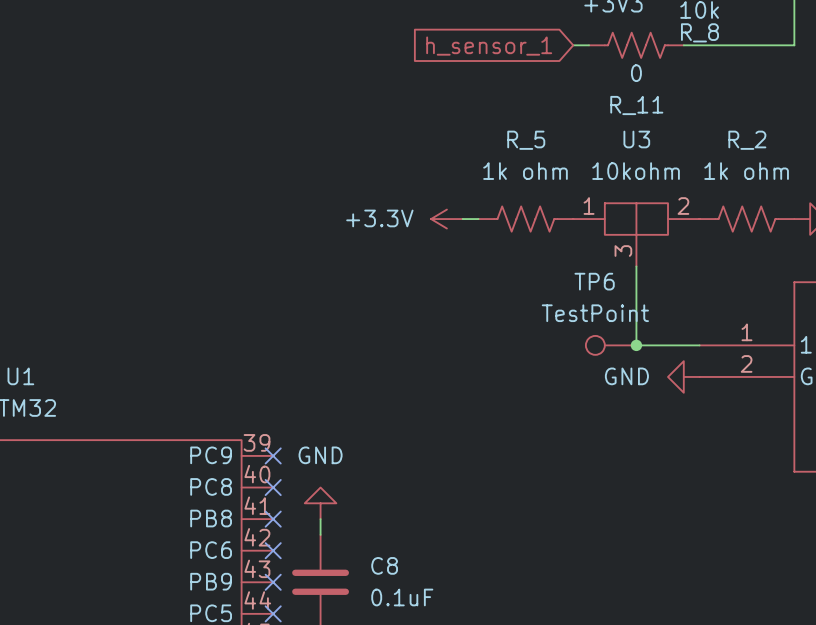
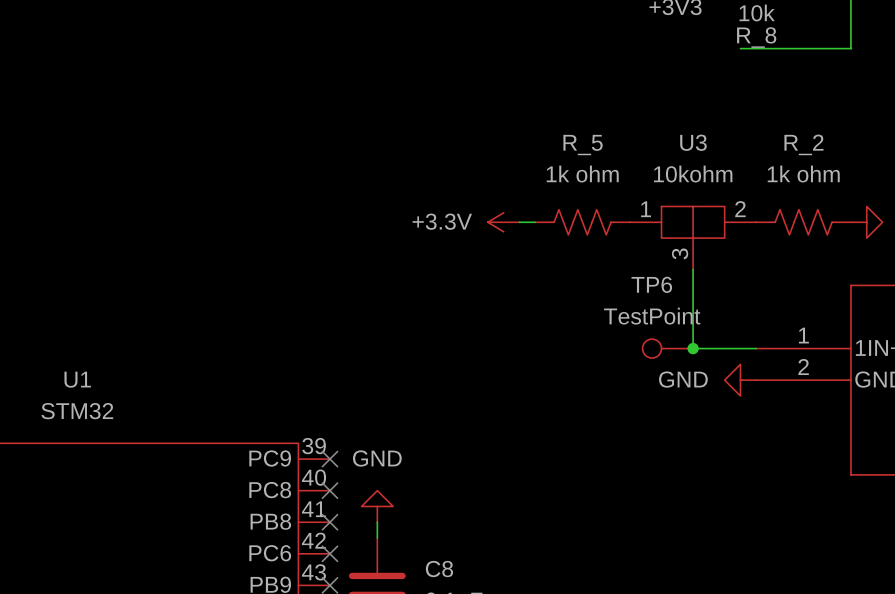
wire: (573, 45) (589, 45) -> none
R_11: 0 (636, 45) -> none
global label: h_sensor_1 (489, 46) -> none

